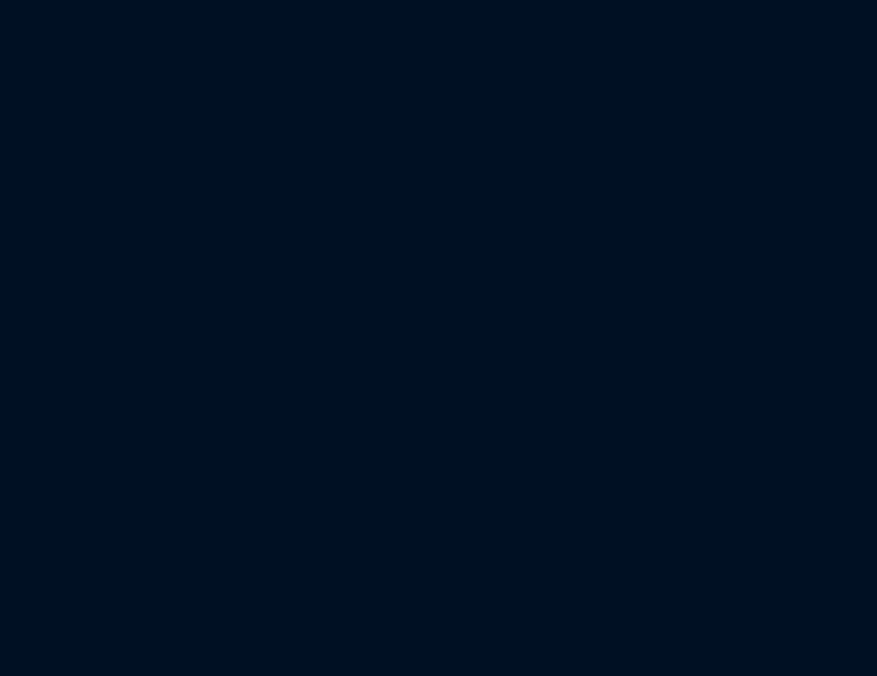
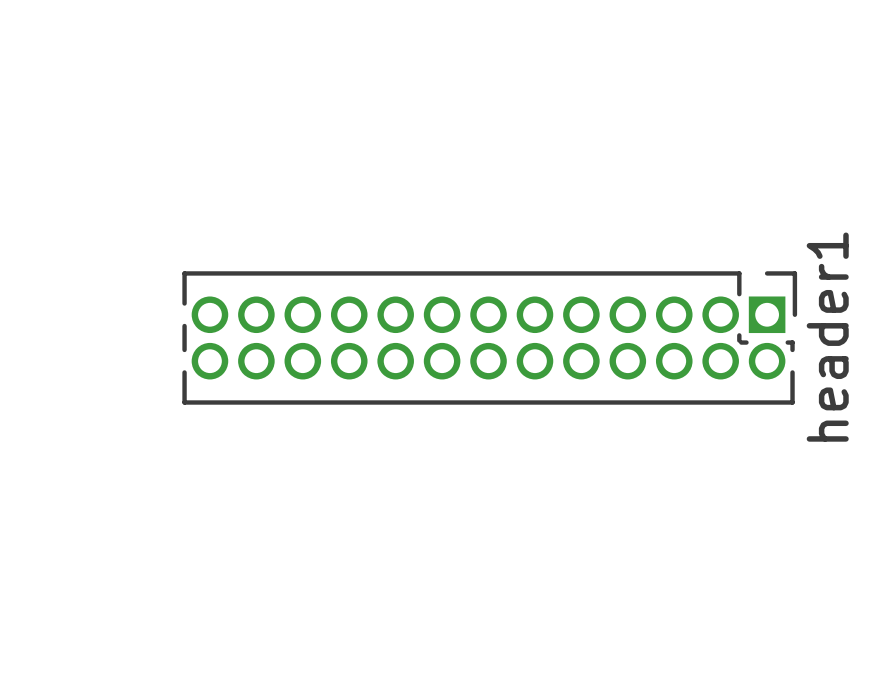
header1: none -> (489, 337)

